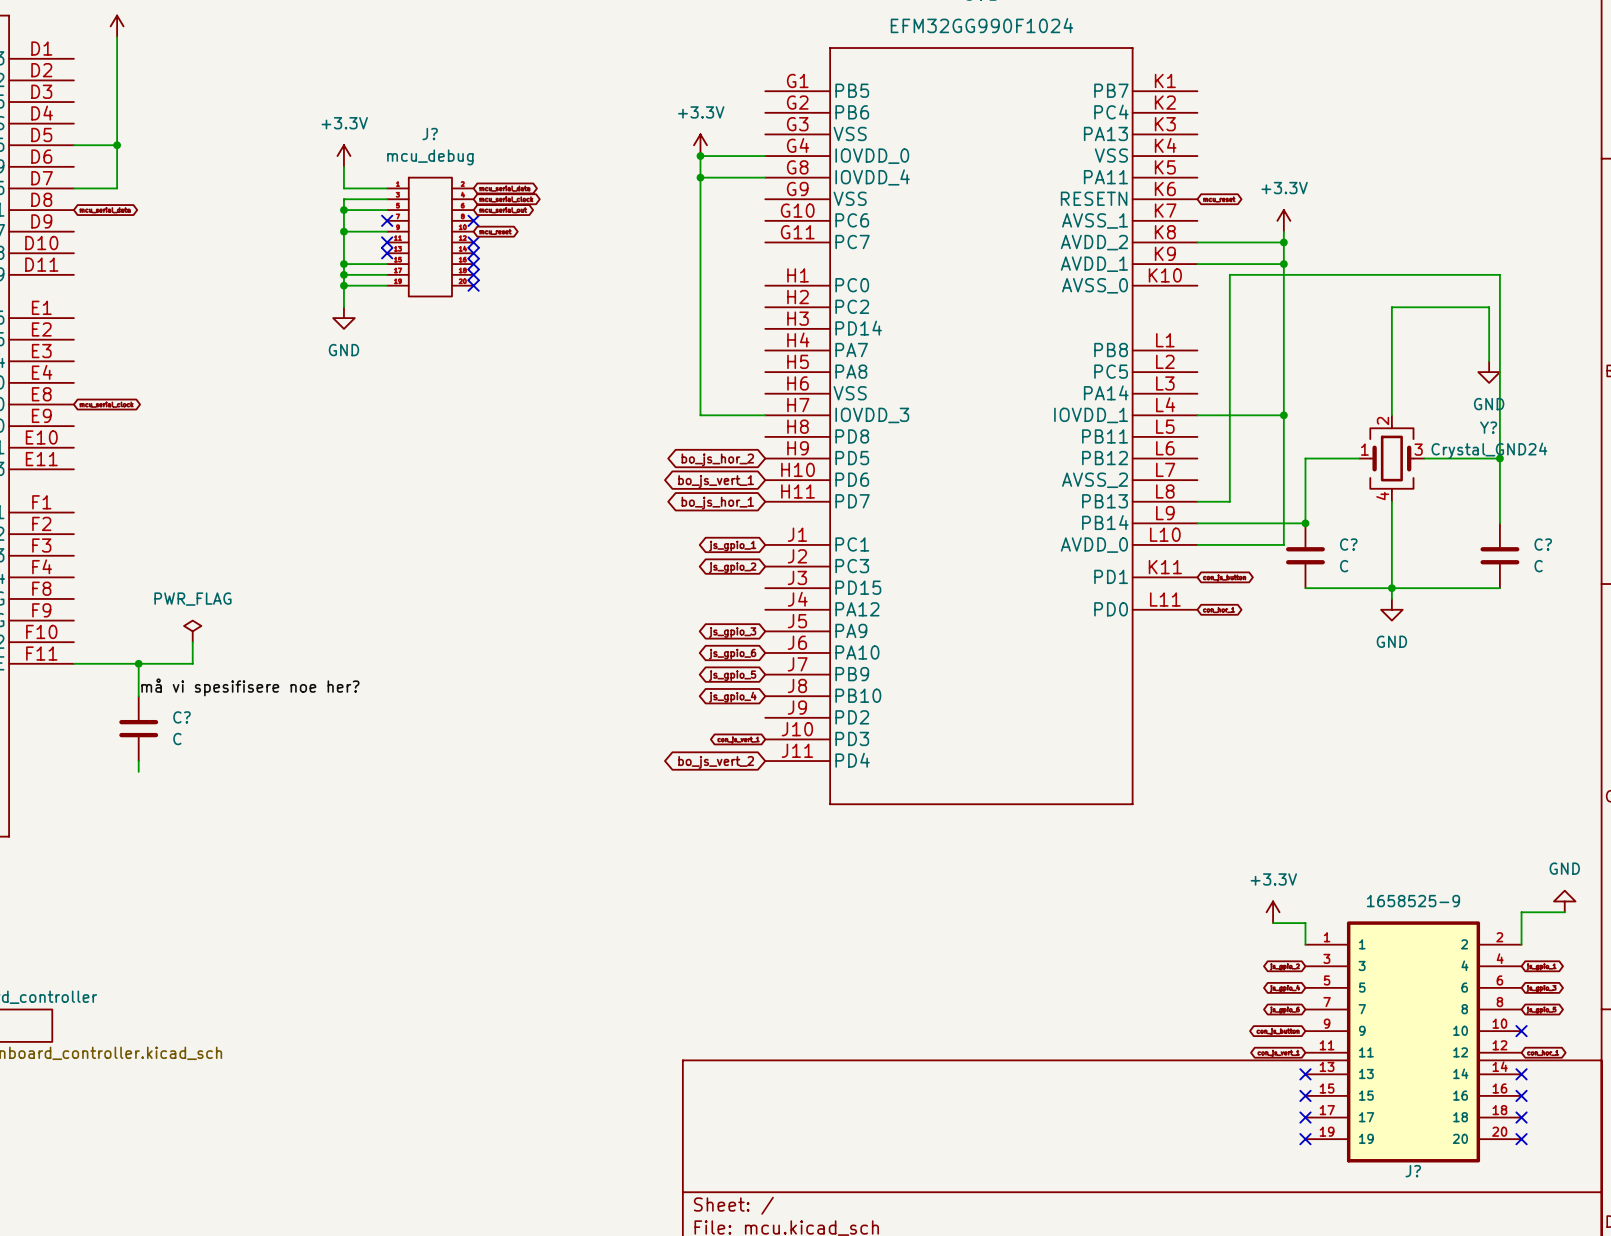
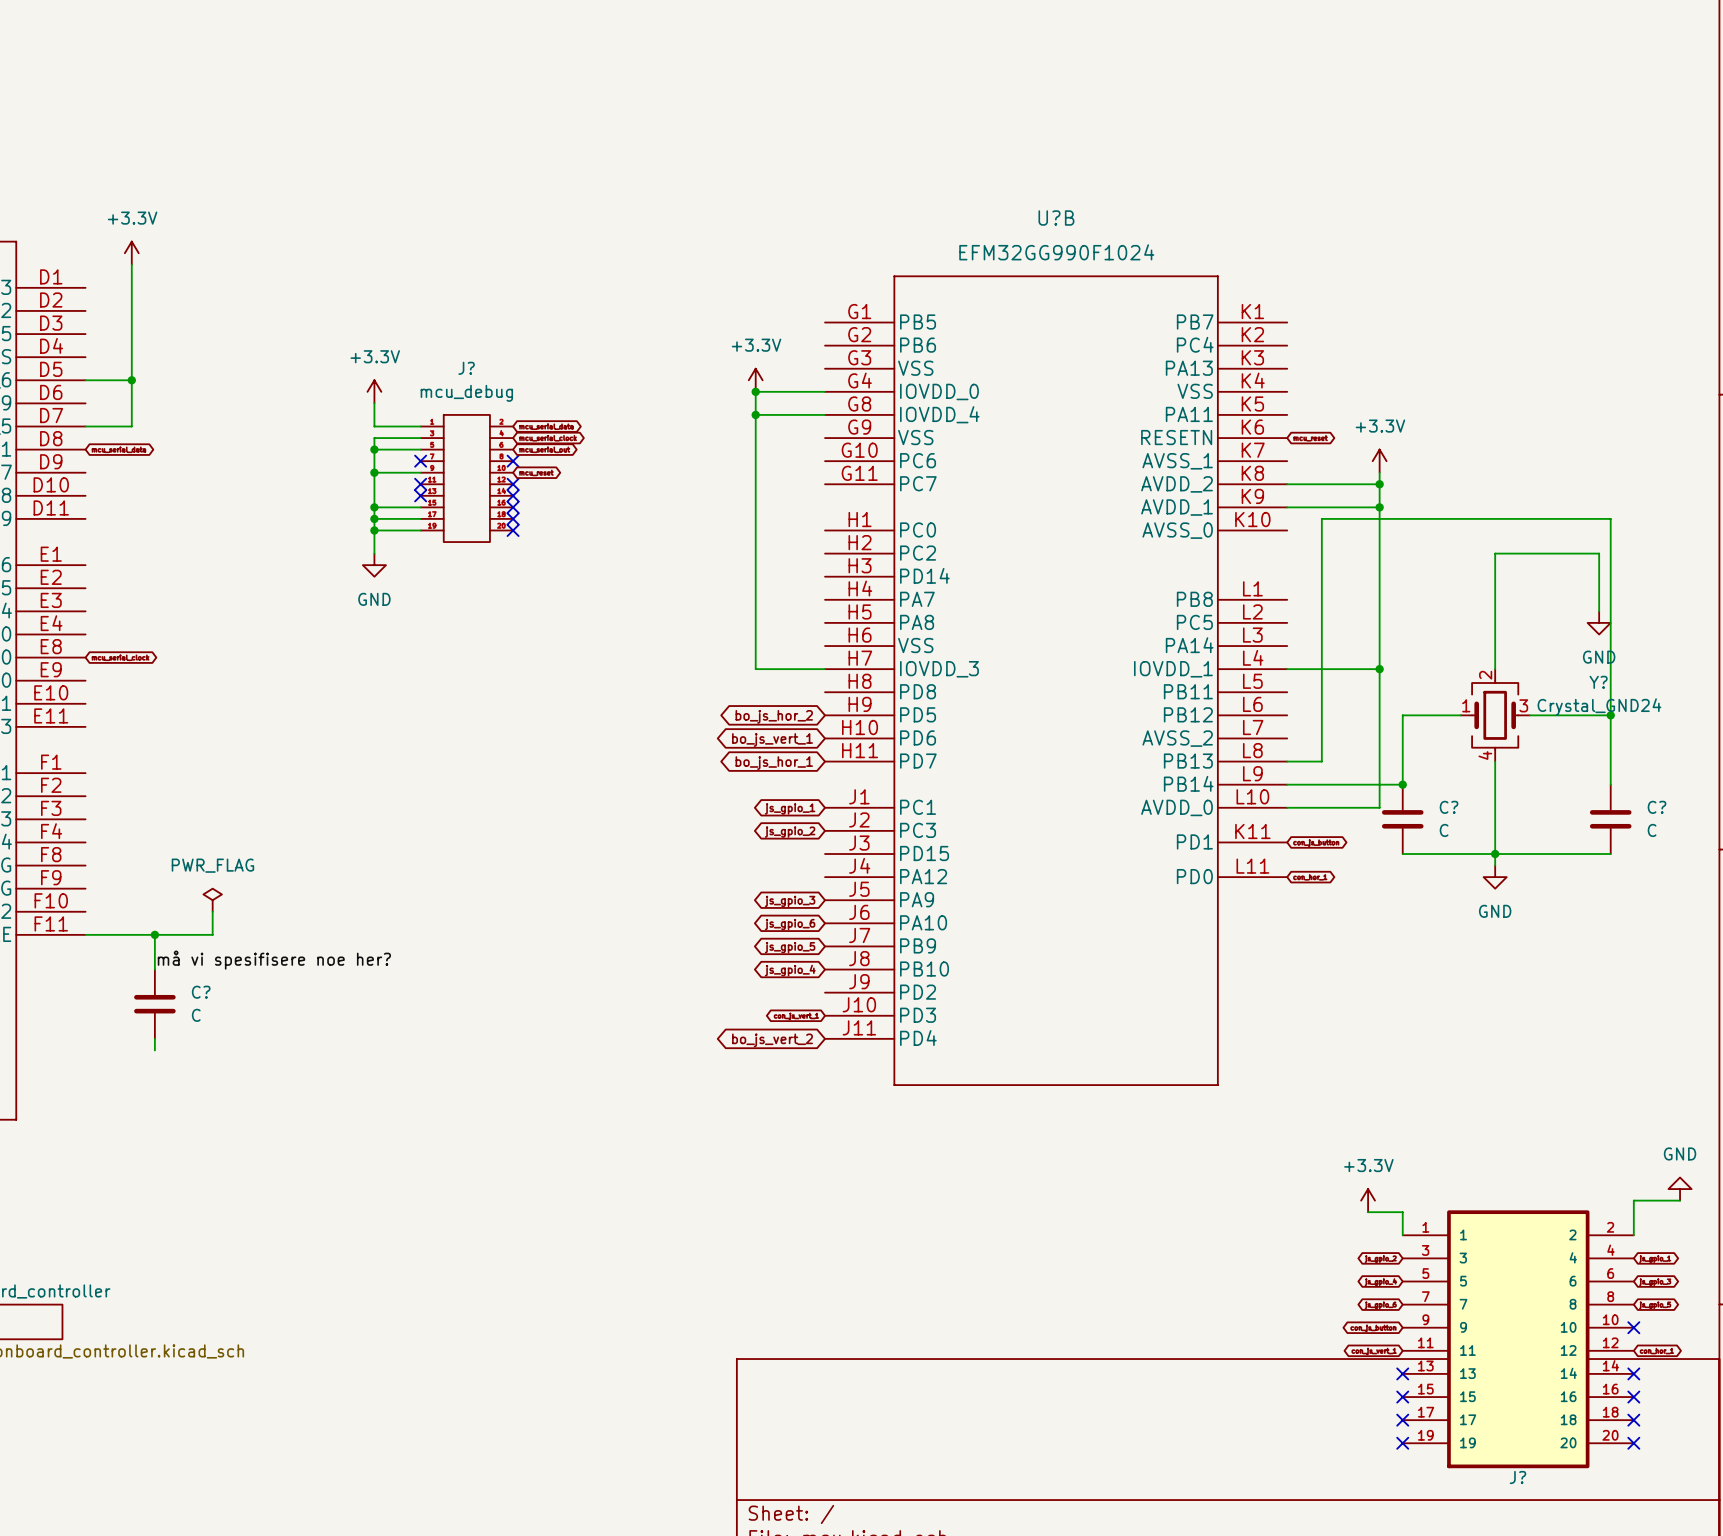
J? value: 1658525-9 (1413, 901) -> none

